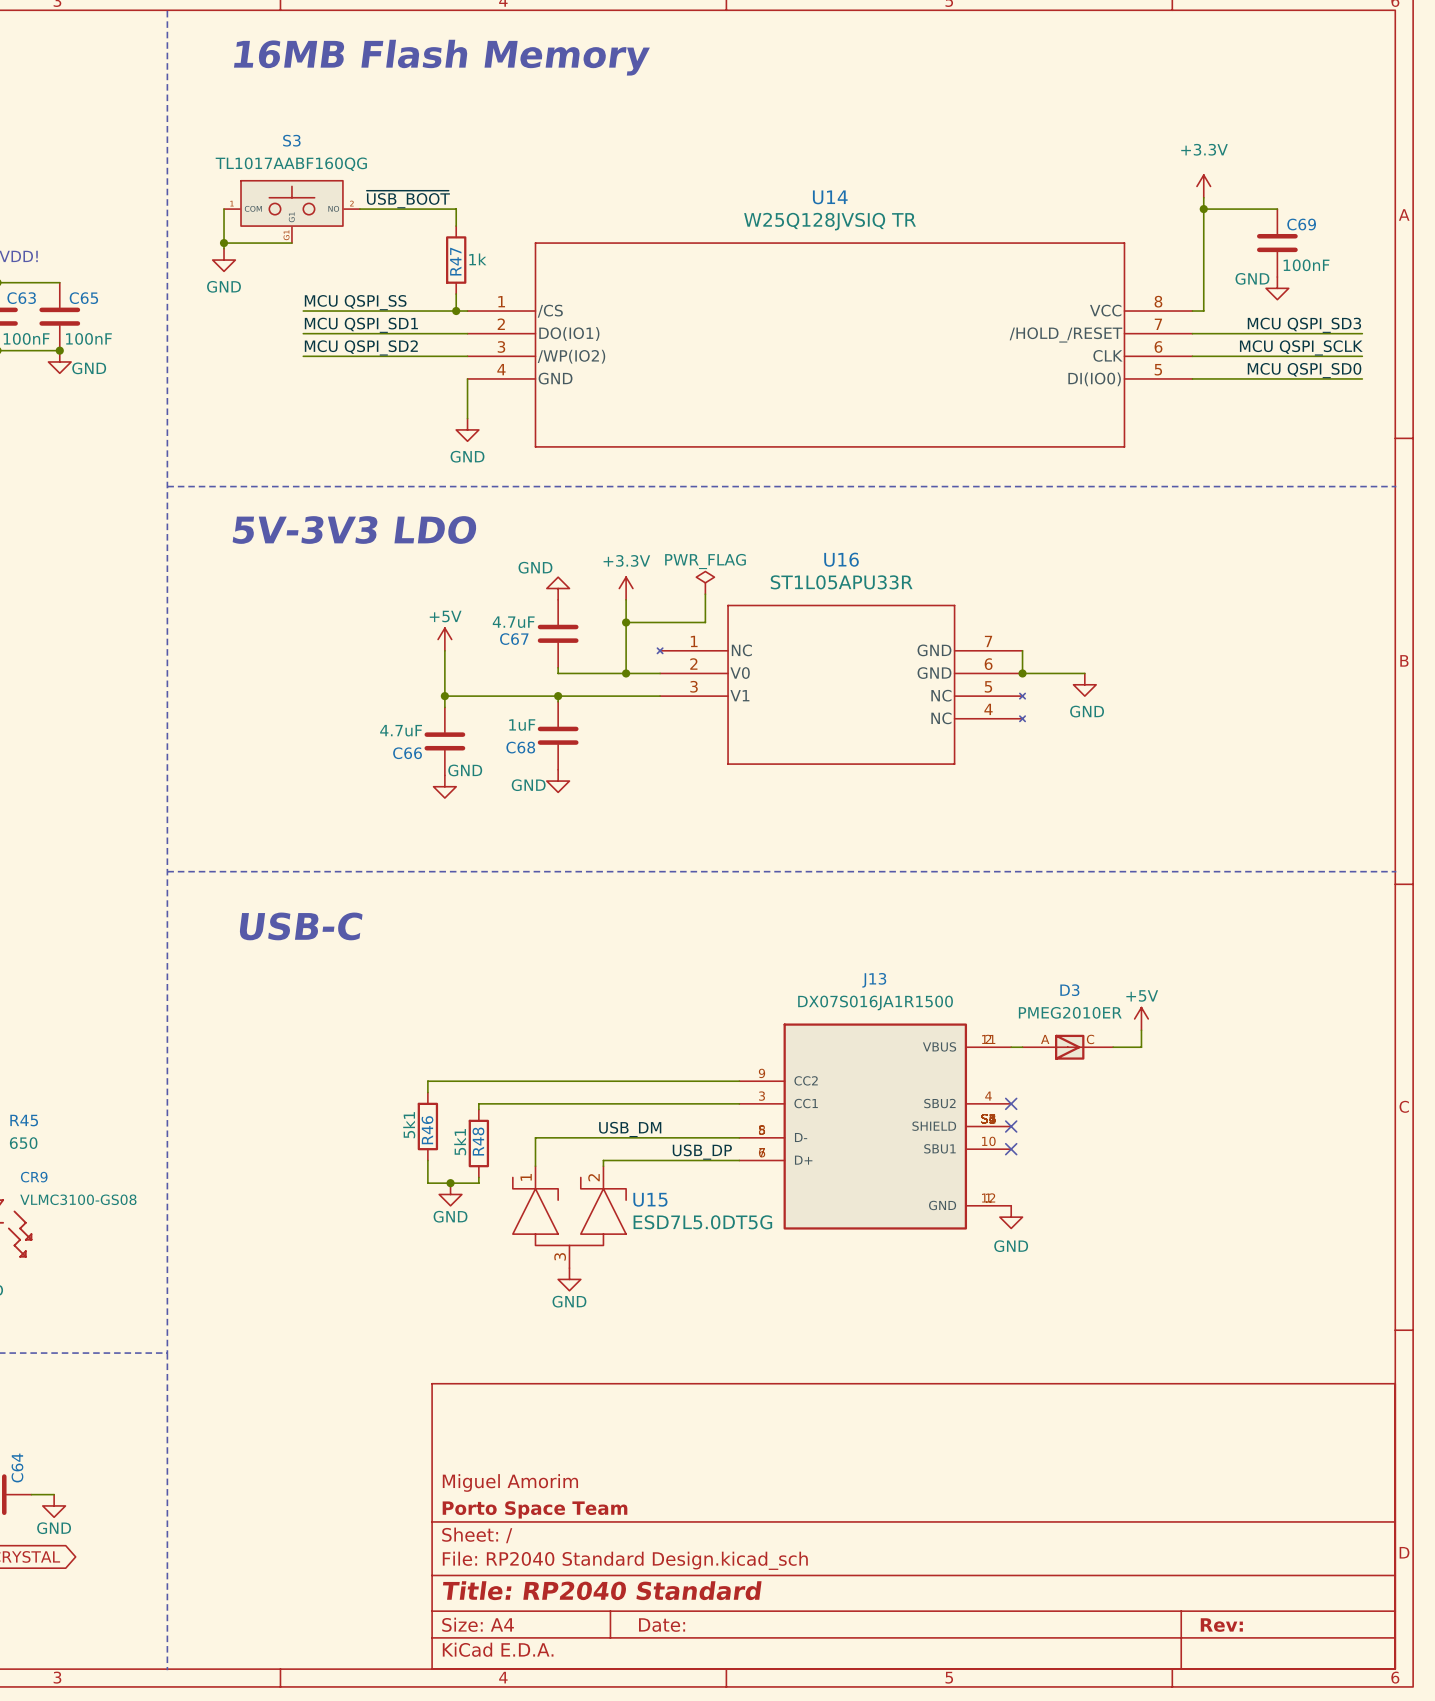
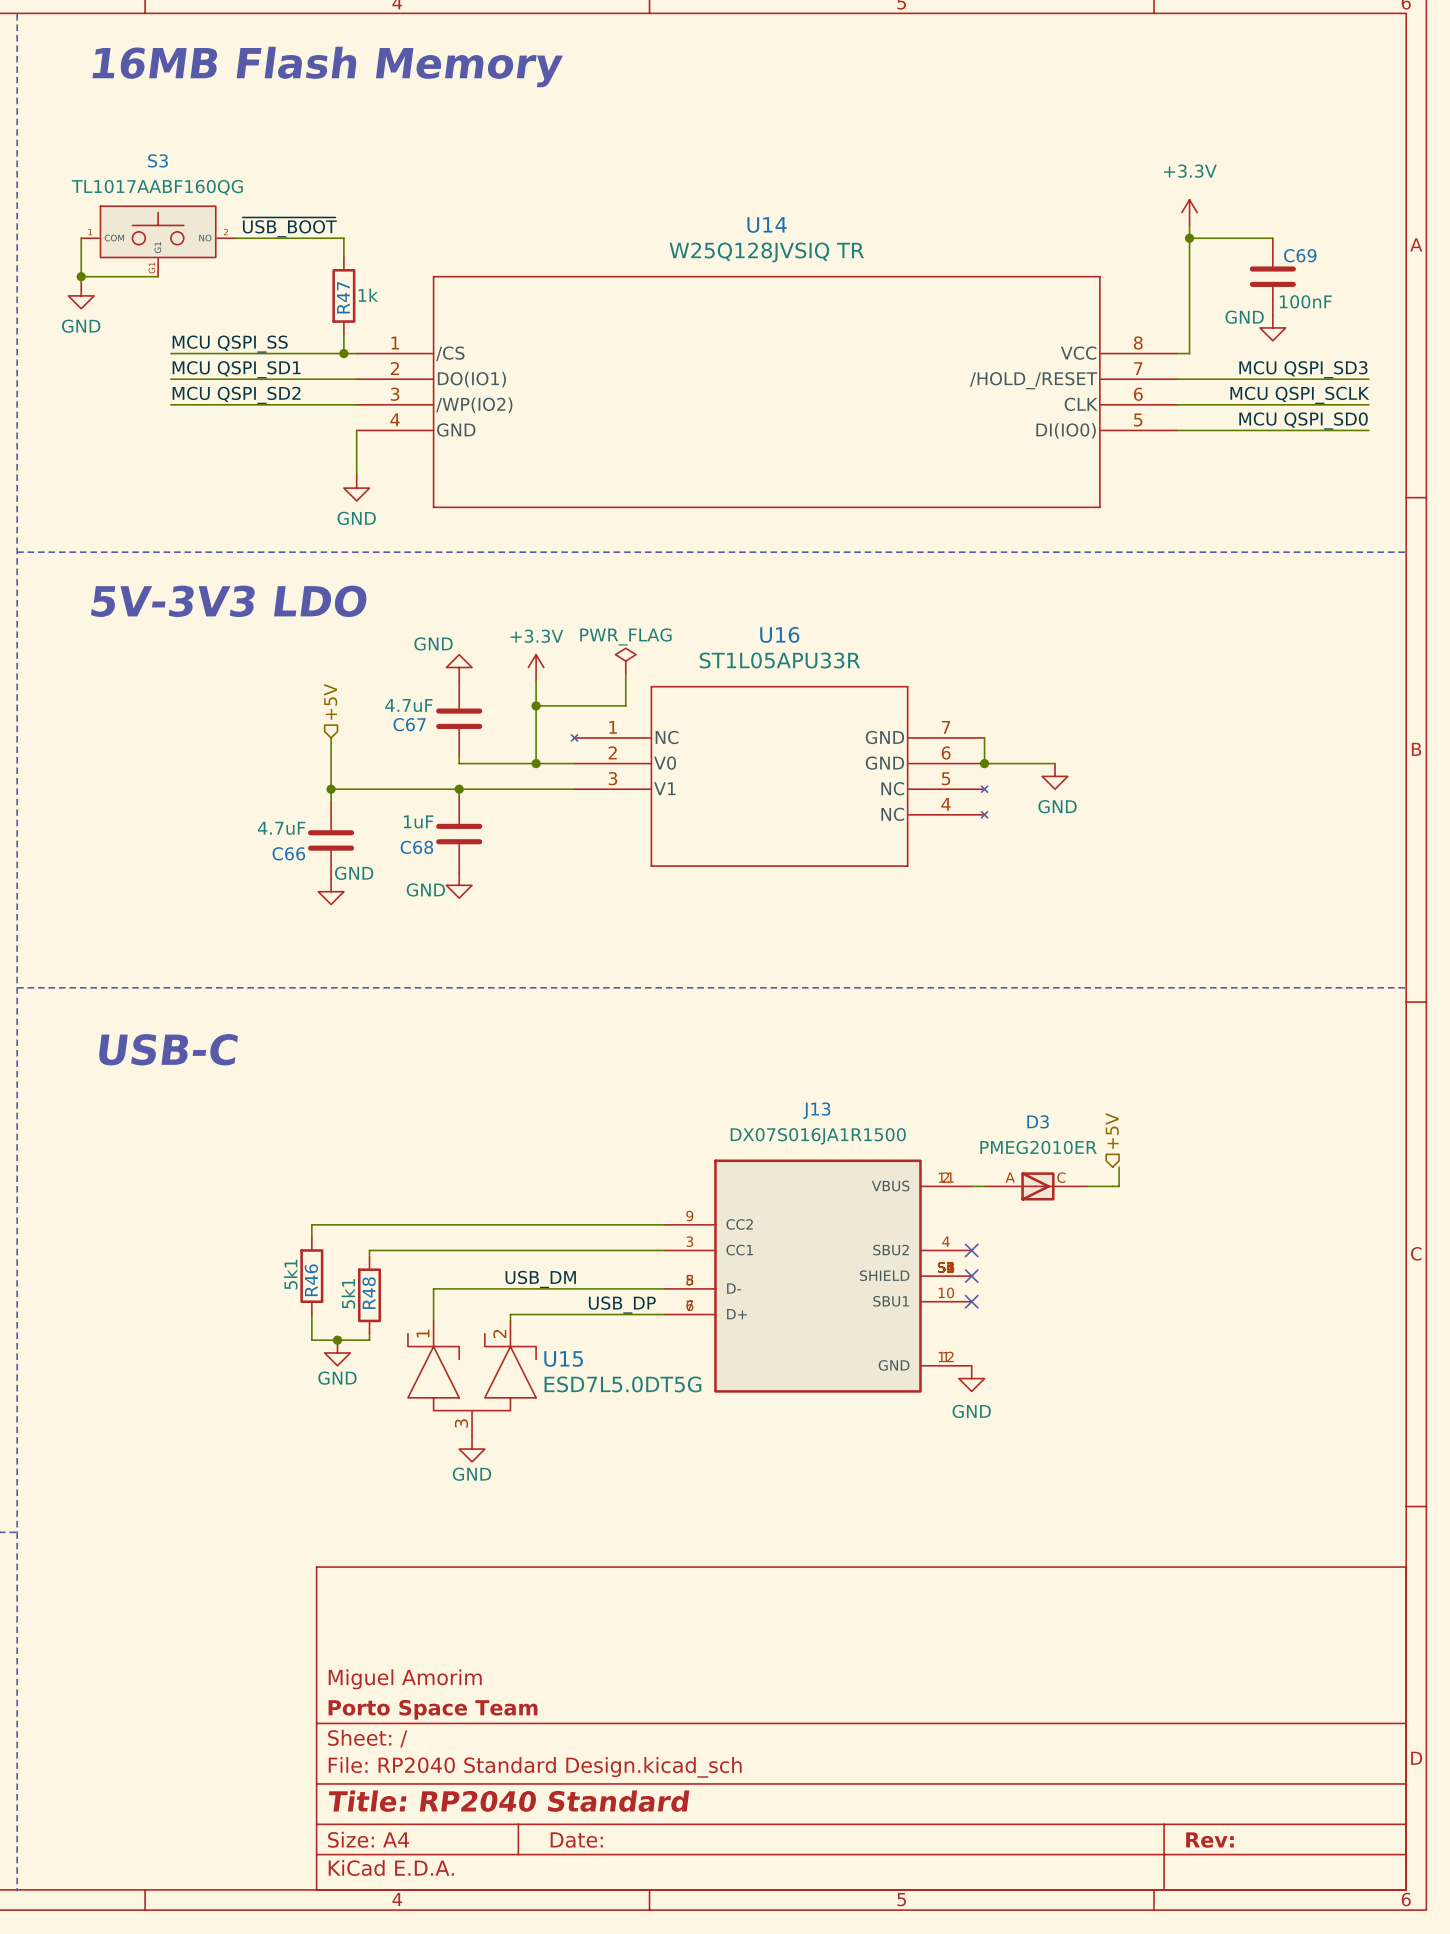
hierarchical label: none -> +5V (330, 701)
power symbol: +5V (444, 639) -> none
hierarchical label: none -> +5V (1112, 1131)
power symbol: +5V (1141, 1018) -> none

